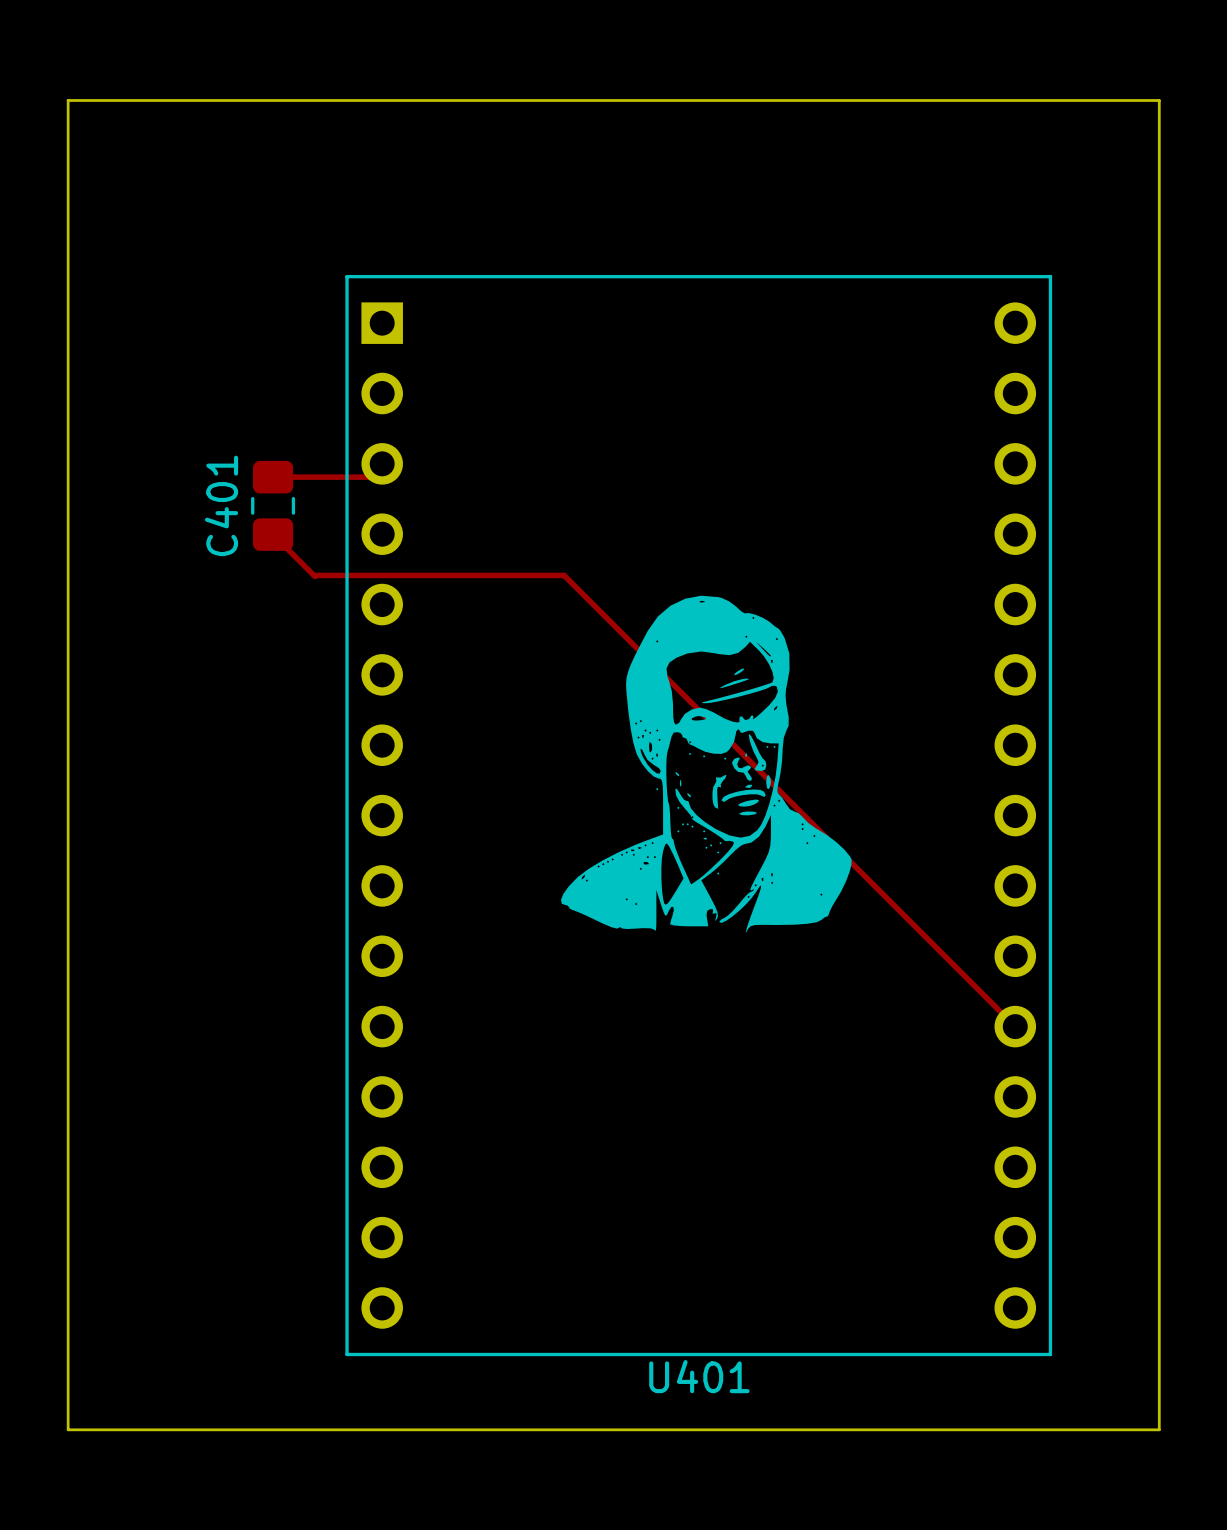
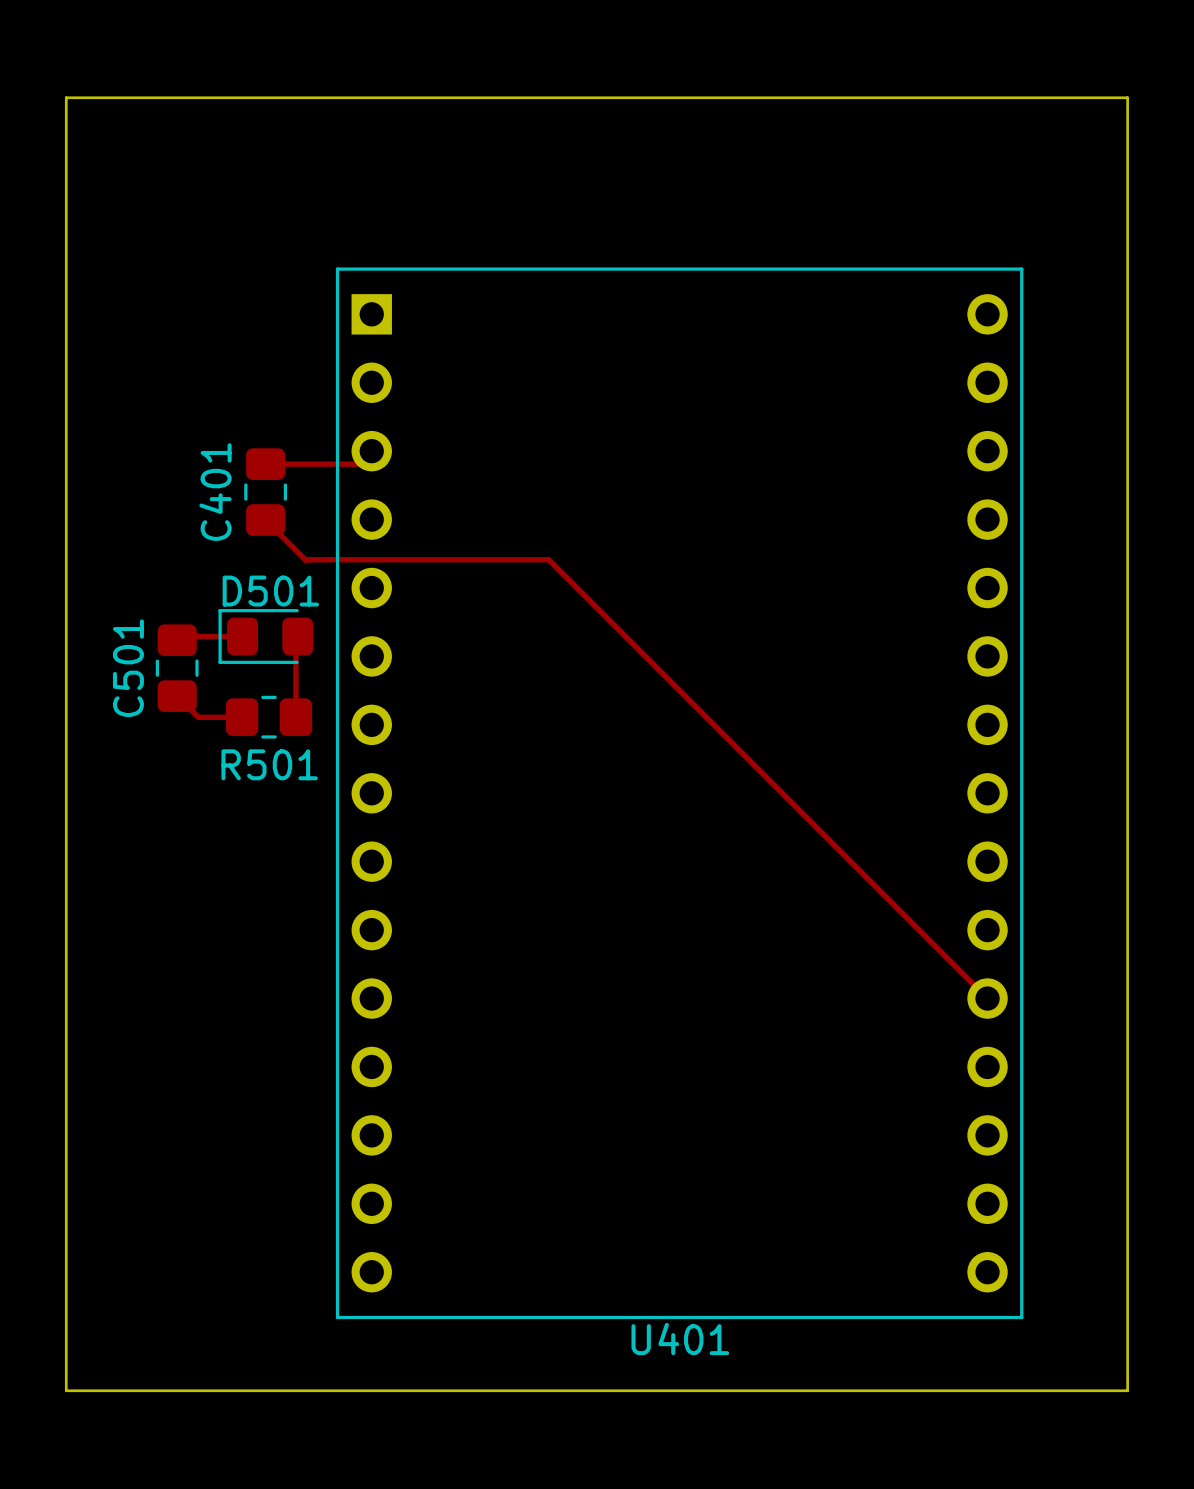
drawing: [561, 595, 852, 933] -> none
track: none -> (242, 636) (180, 636) (177, 640)
D501: none -> (265, 636)
track: none -> (297, 636) (295, 638) (295, 717)
C501: none -> (177, 668)
track: none -> (177, 696) (198, 717) (241, 717)
R501: none -> (268, 717)

